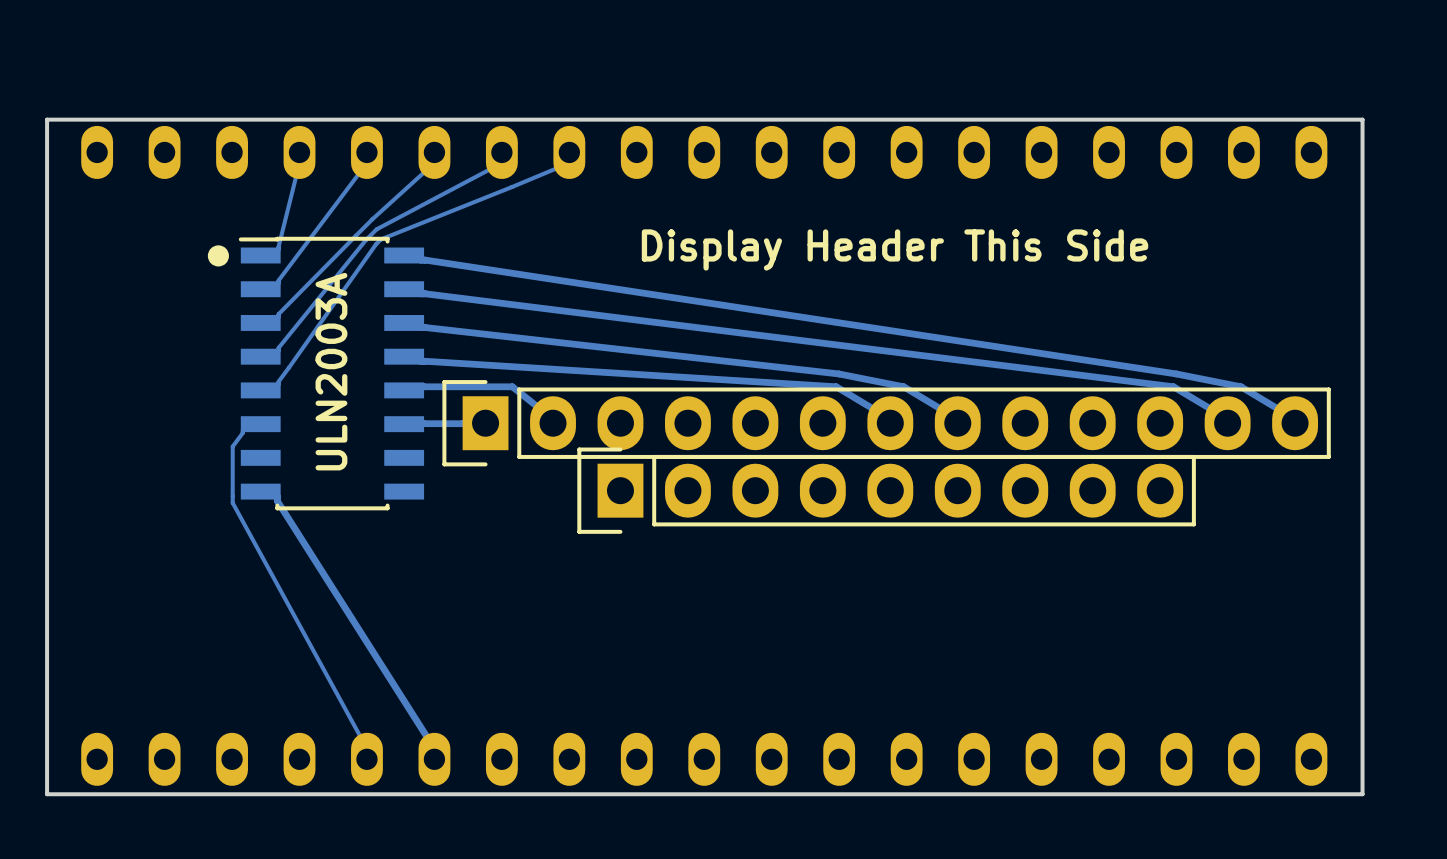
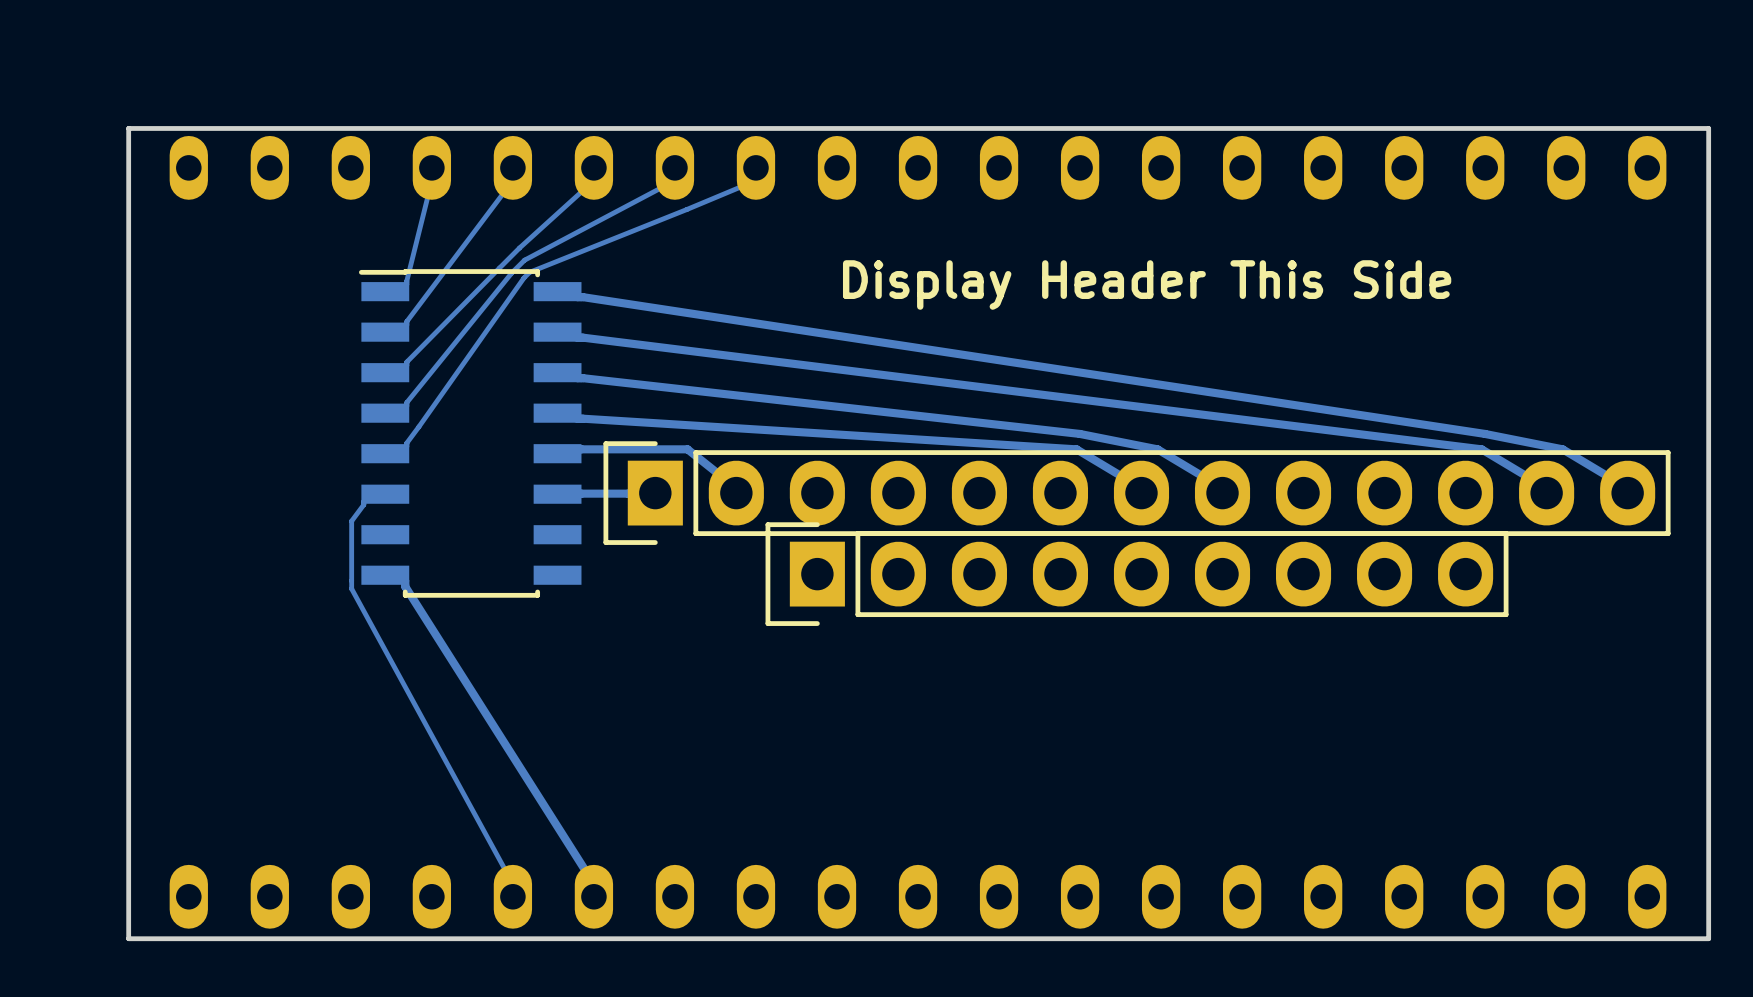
drawing: [207, 245, 229, 267] -> none
text: ULN2003A (331, 371) -> none

